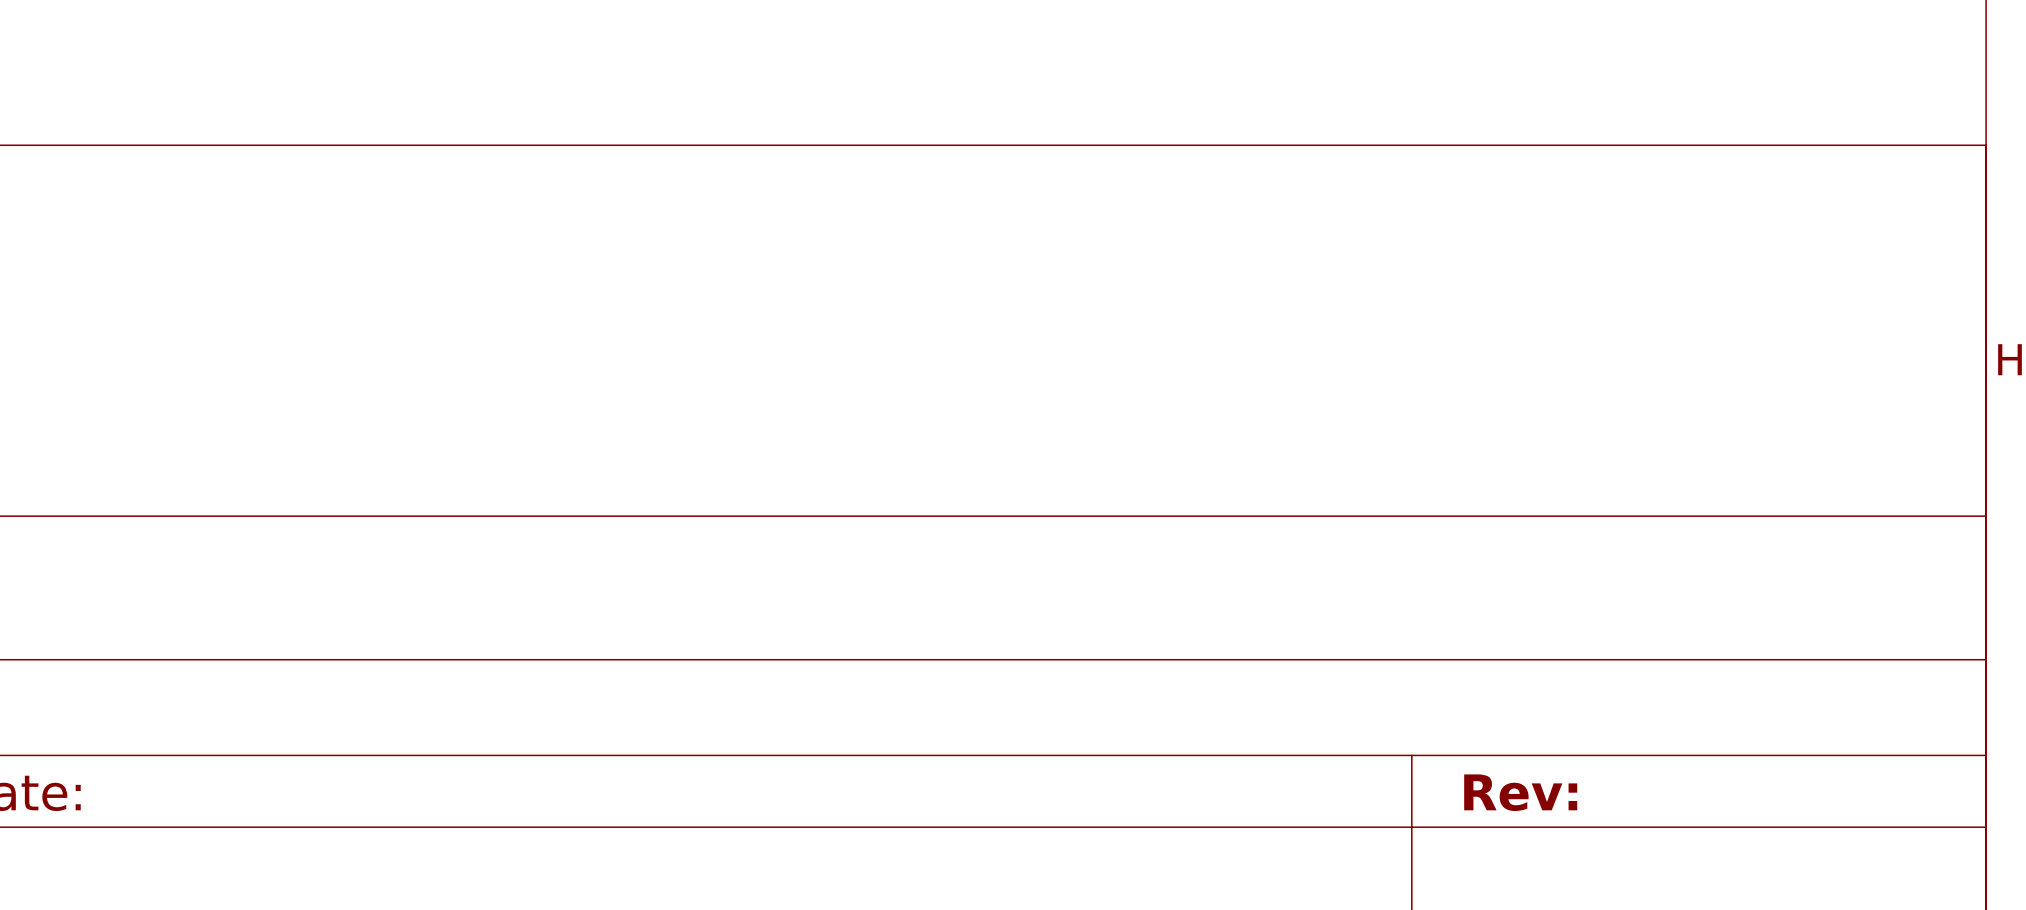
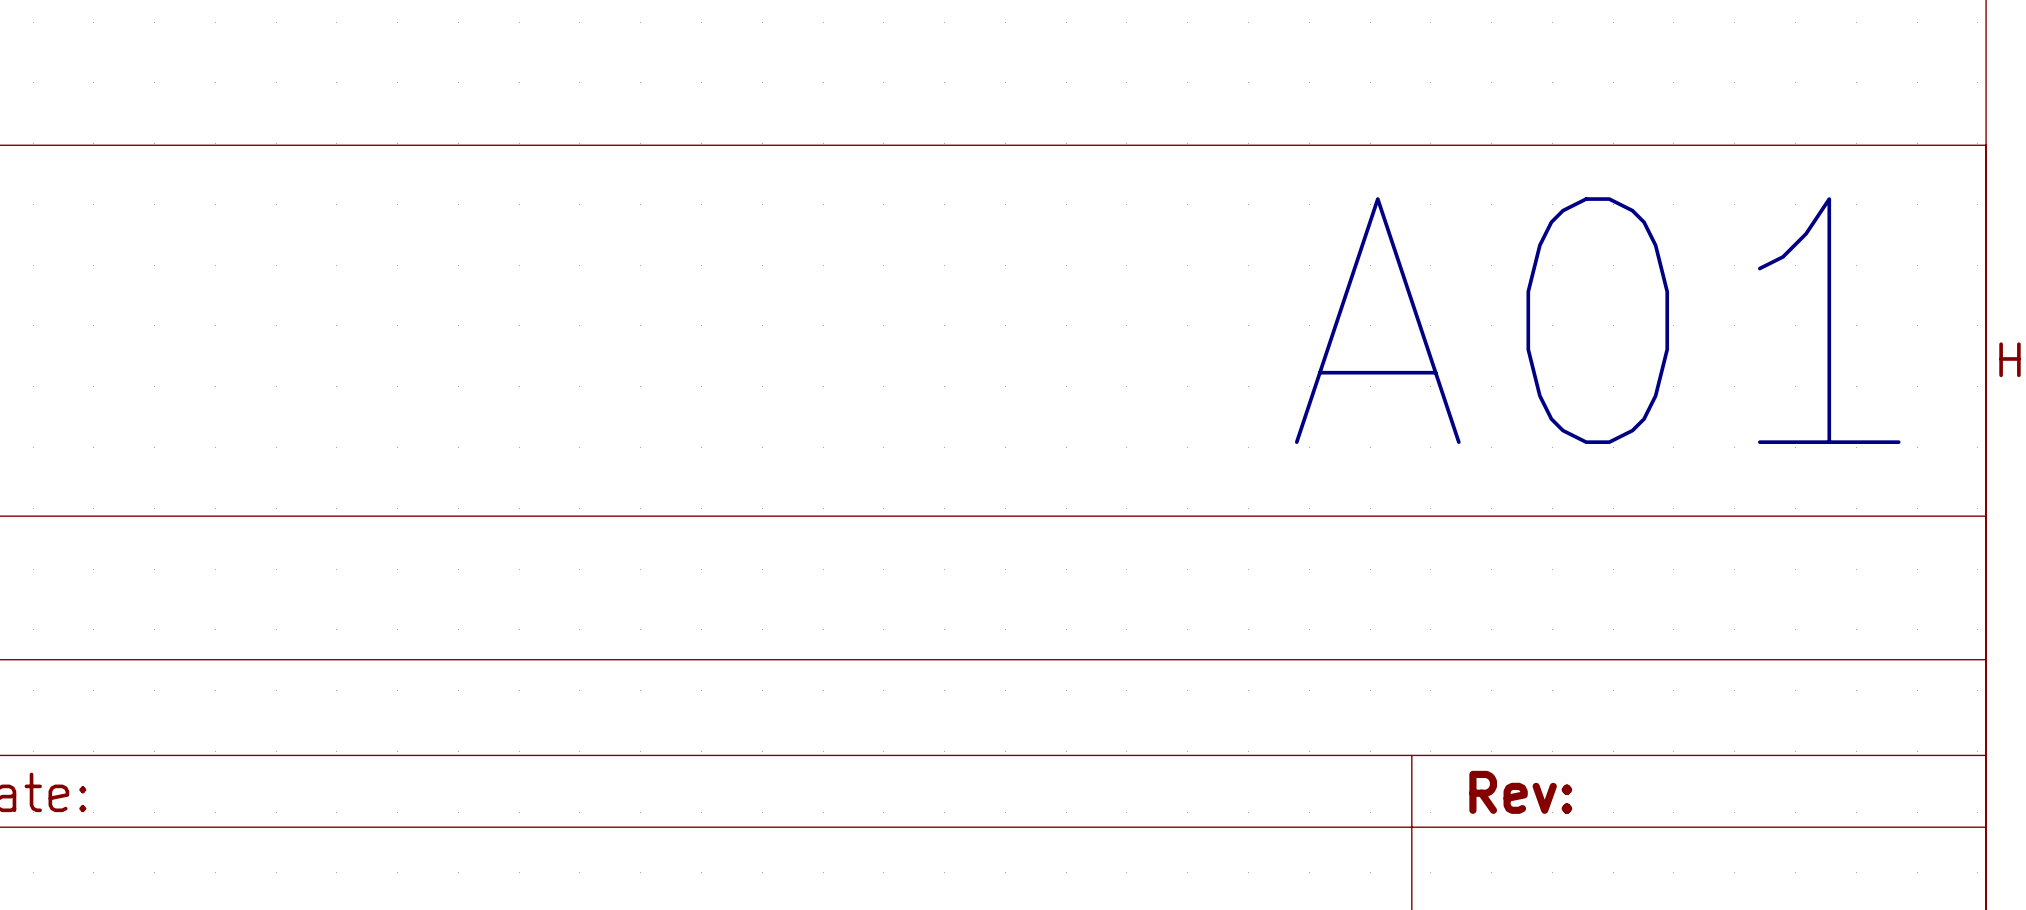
text: none -> A01 (1597, 320)

